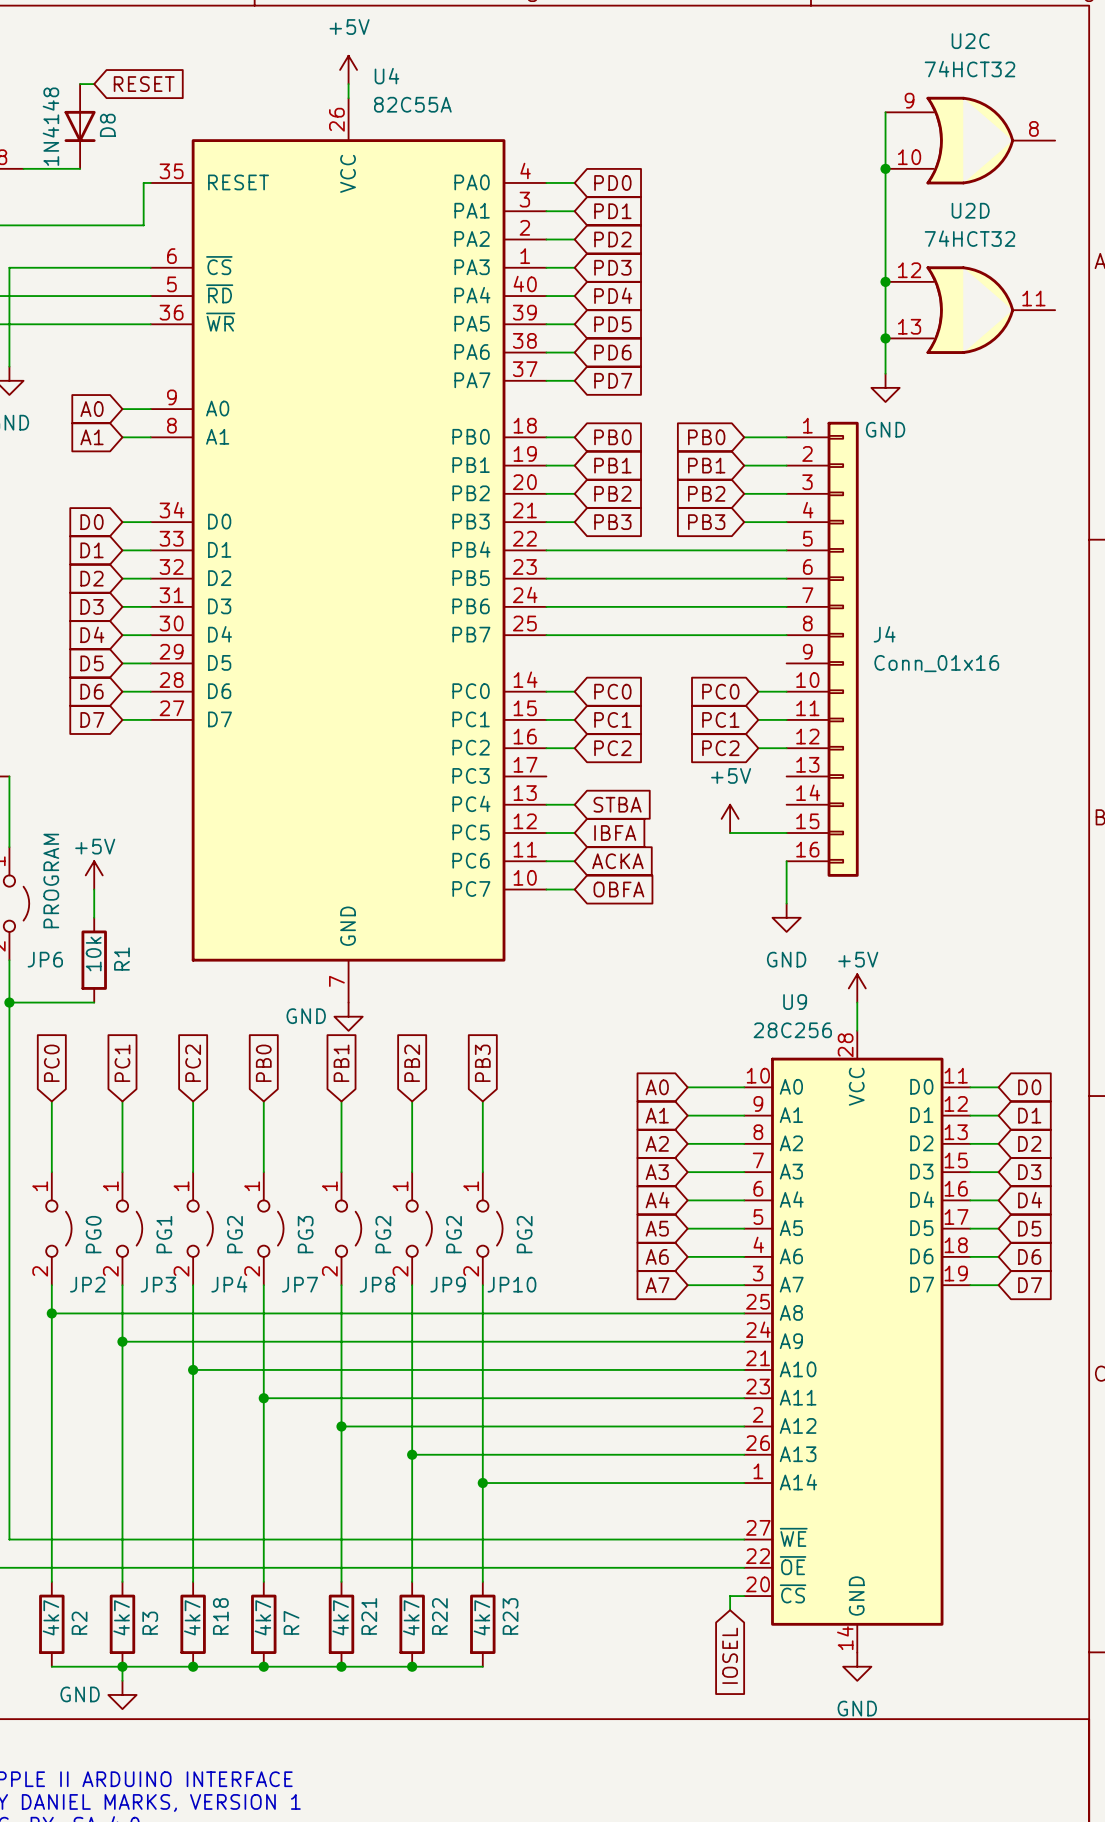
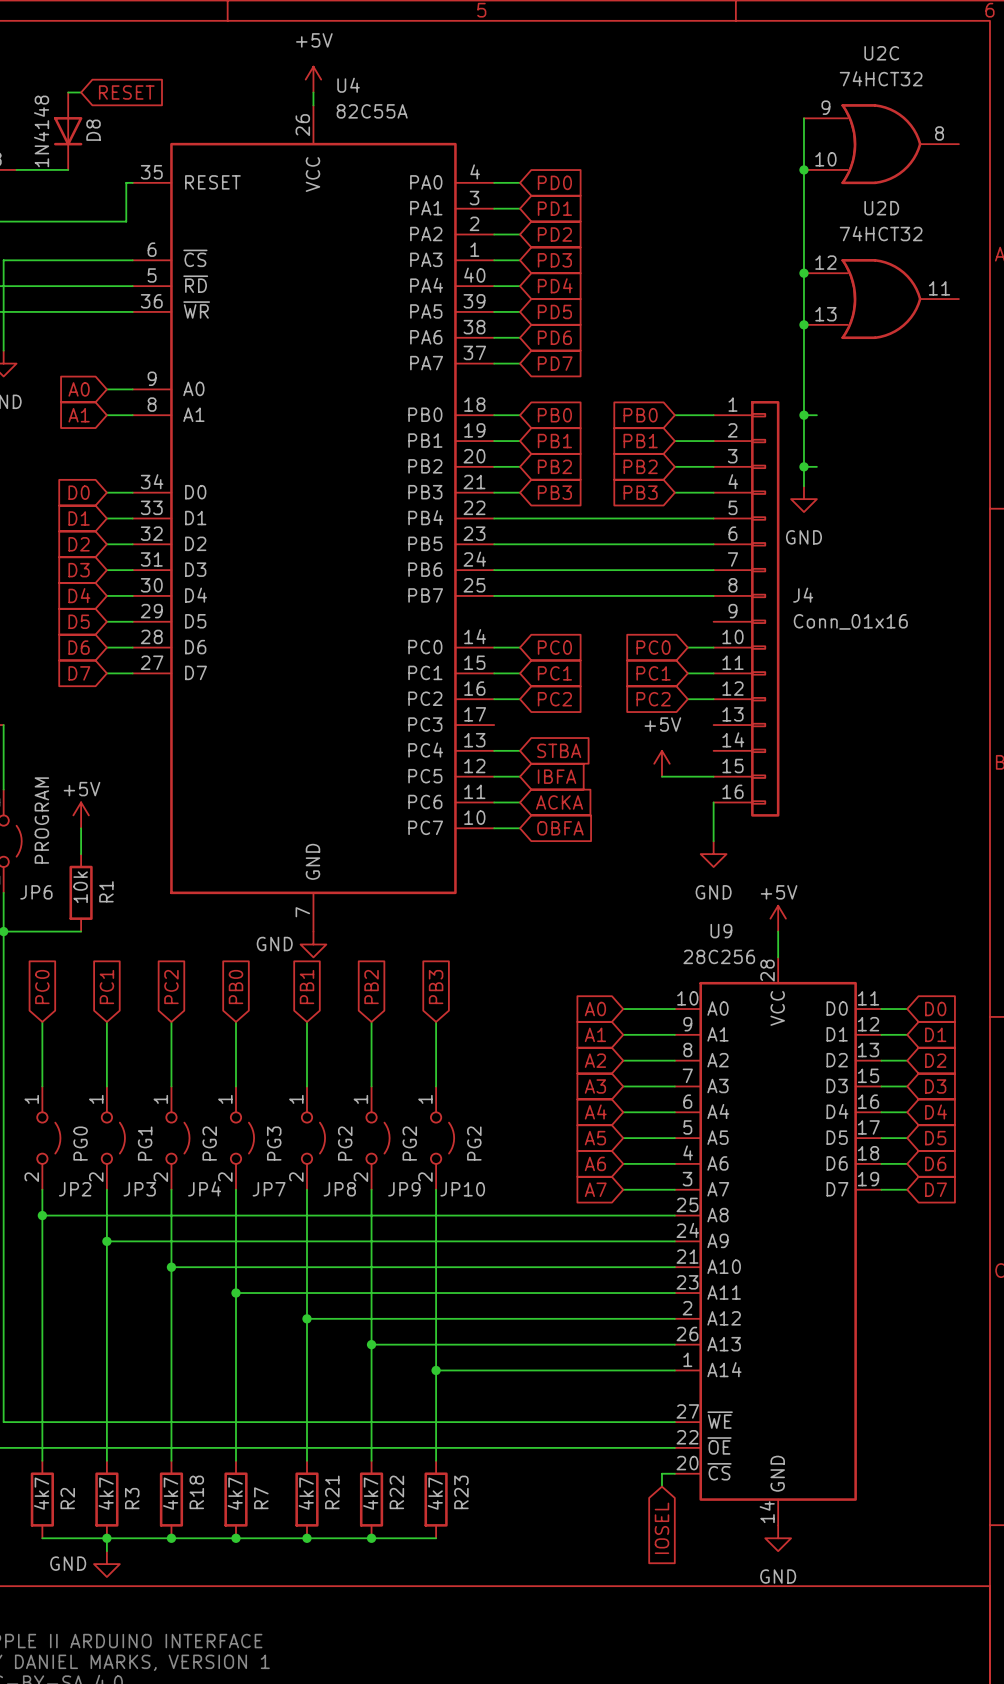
wire: none -> (803, 357) (803, 486)
power symbol position: GND (885, 387) -> GND (803, 499)
wire: none -> (803, 415) (816, 415)
junction: none -> (803, 415)
wire: none -> (803, 466) (816, 466)
junction: none -> (803, 466)

